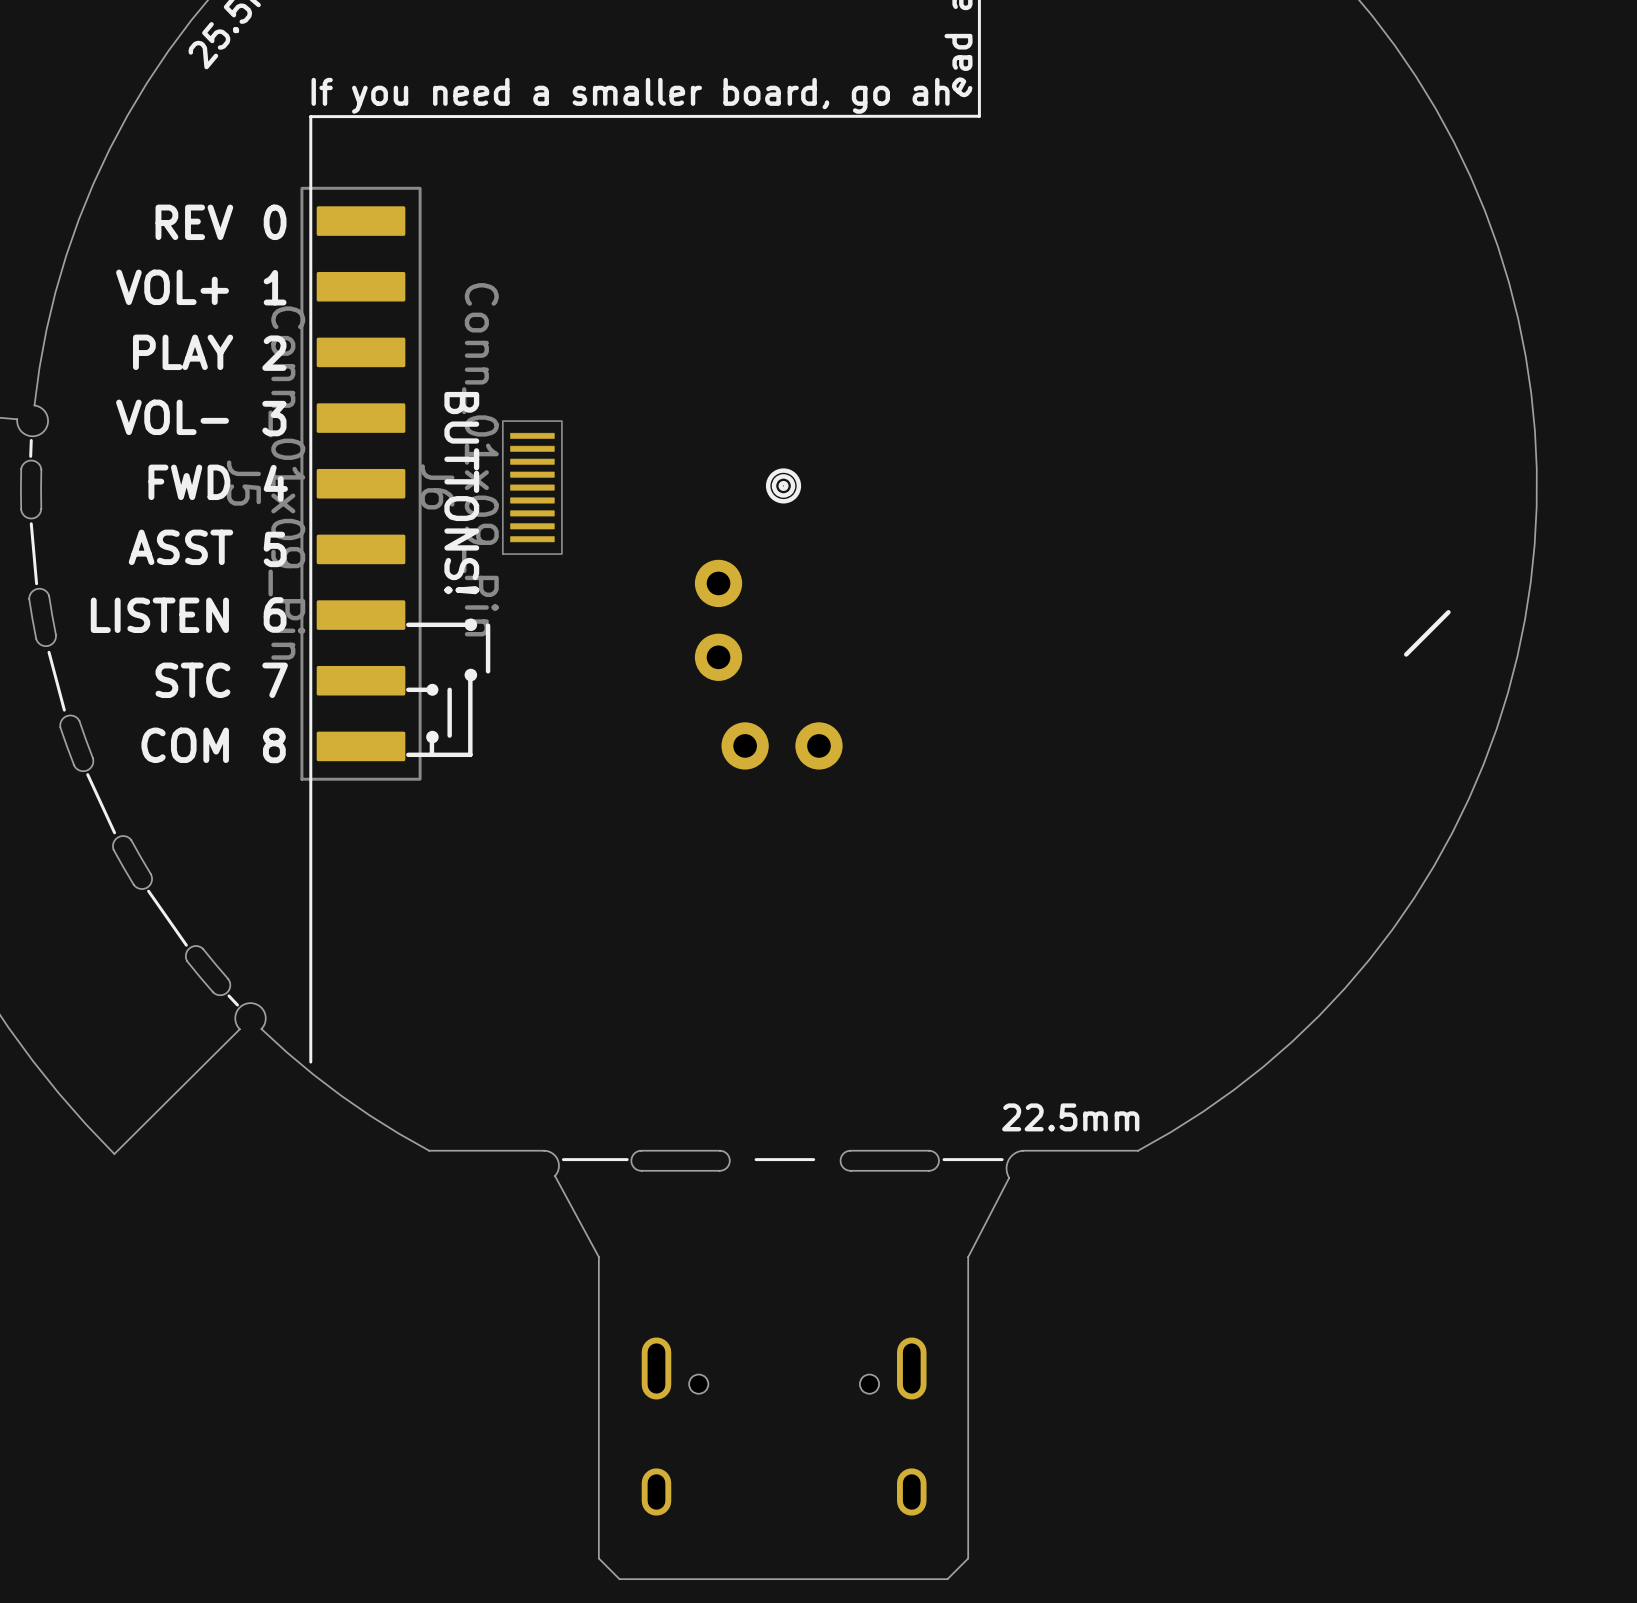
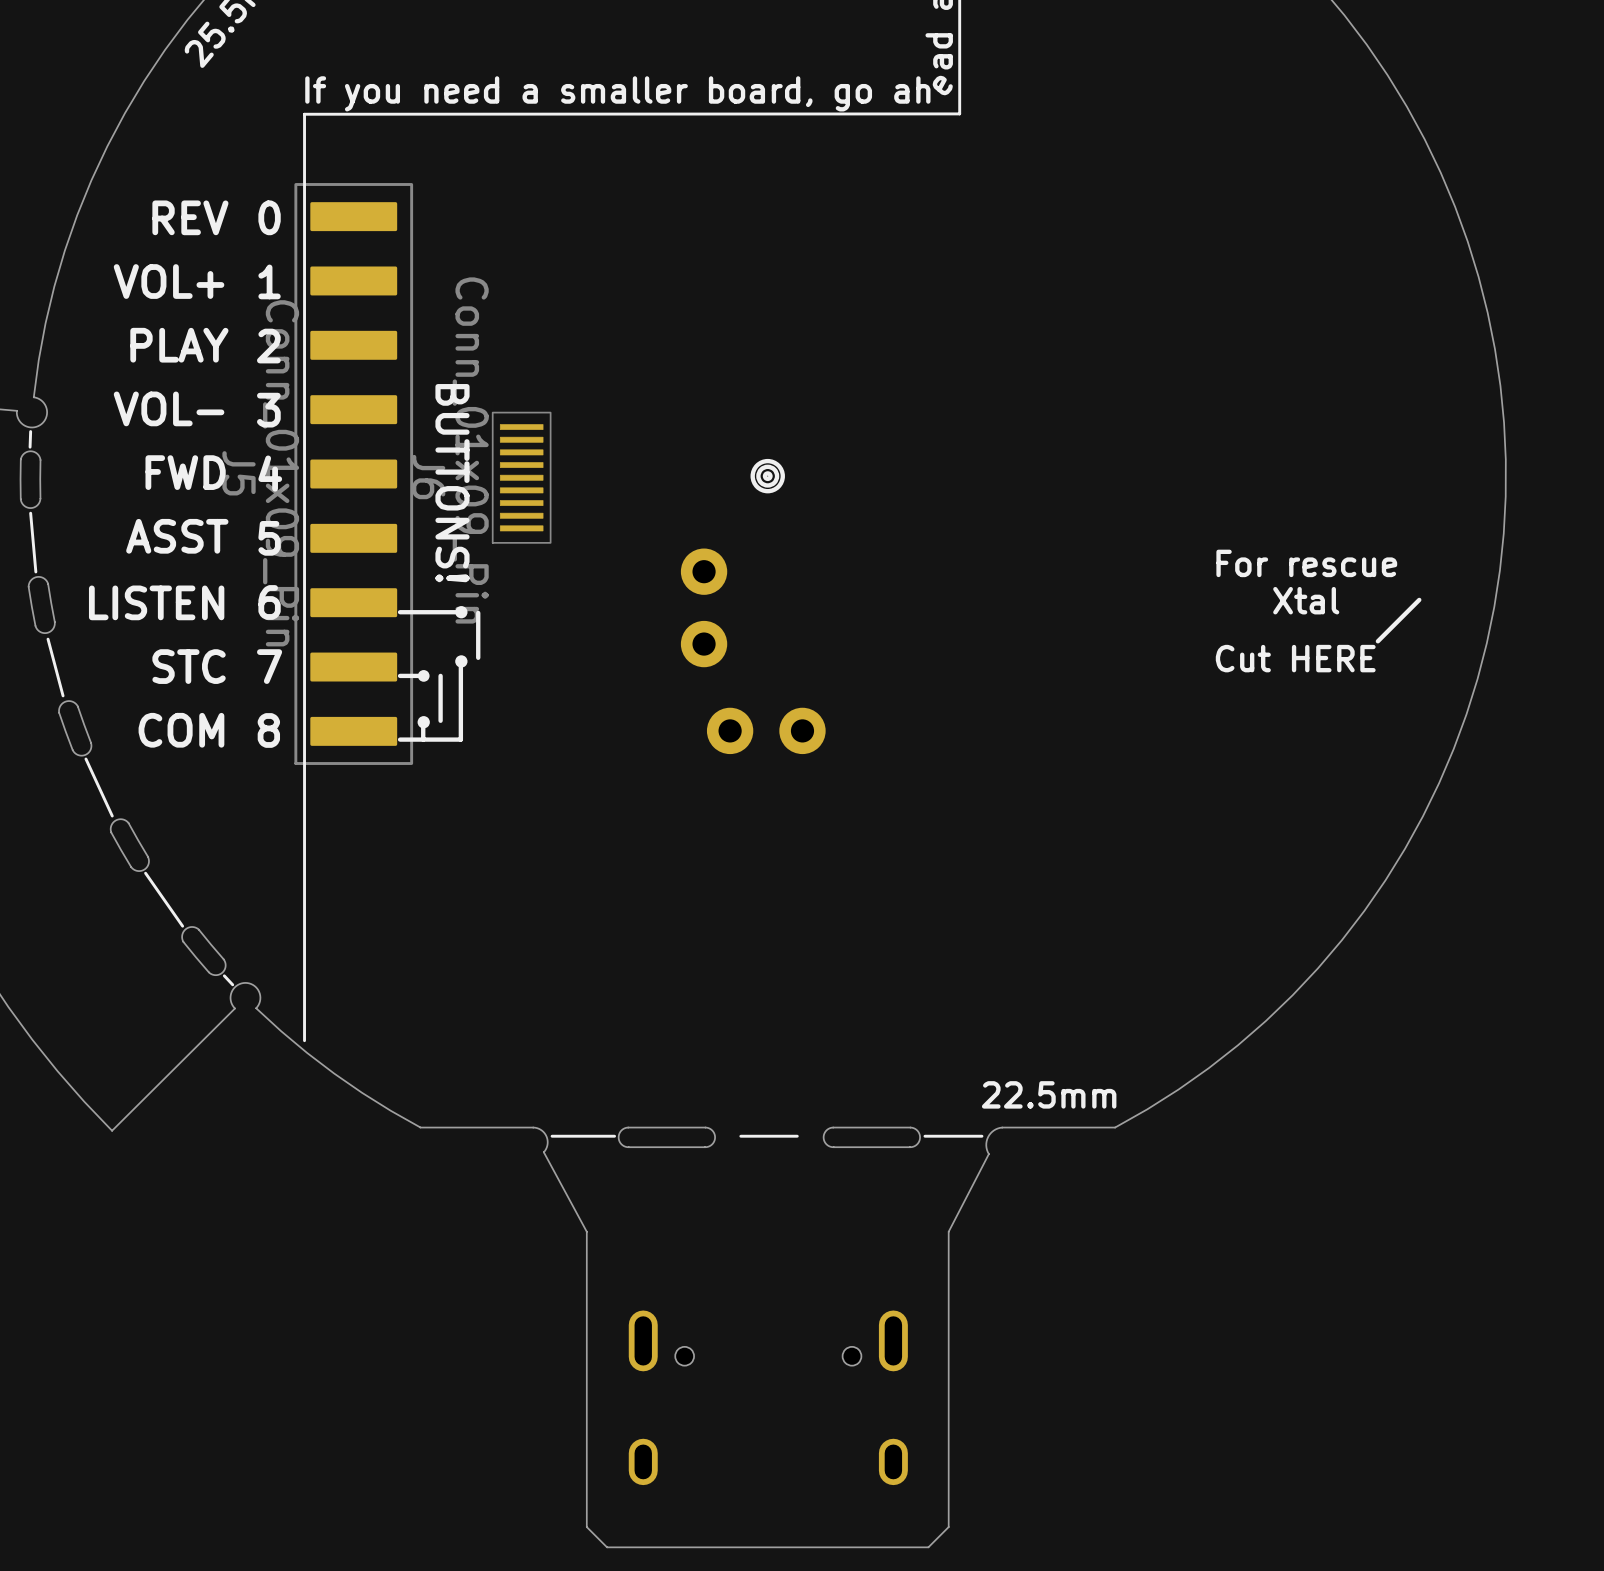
text: none -> For rescue (1306, 563)
text: none -> Xtal (1306, 600)
text: none -> Cut HERE (1295, 658)

